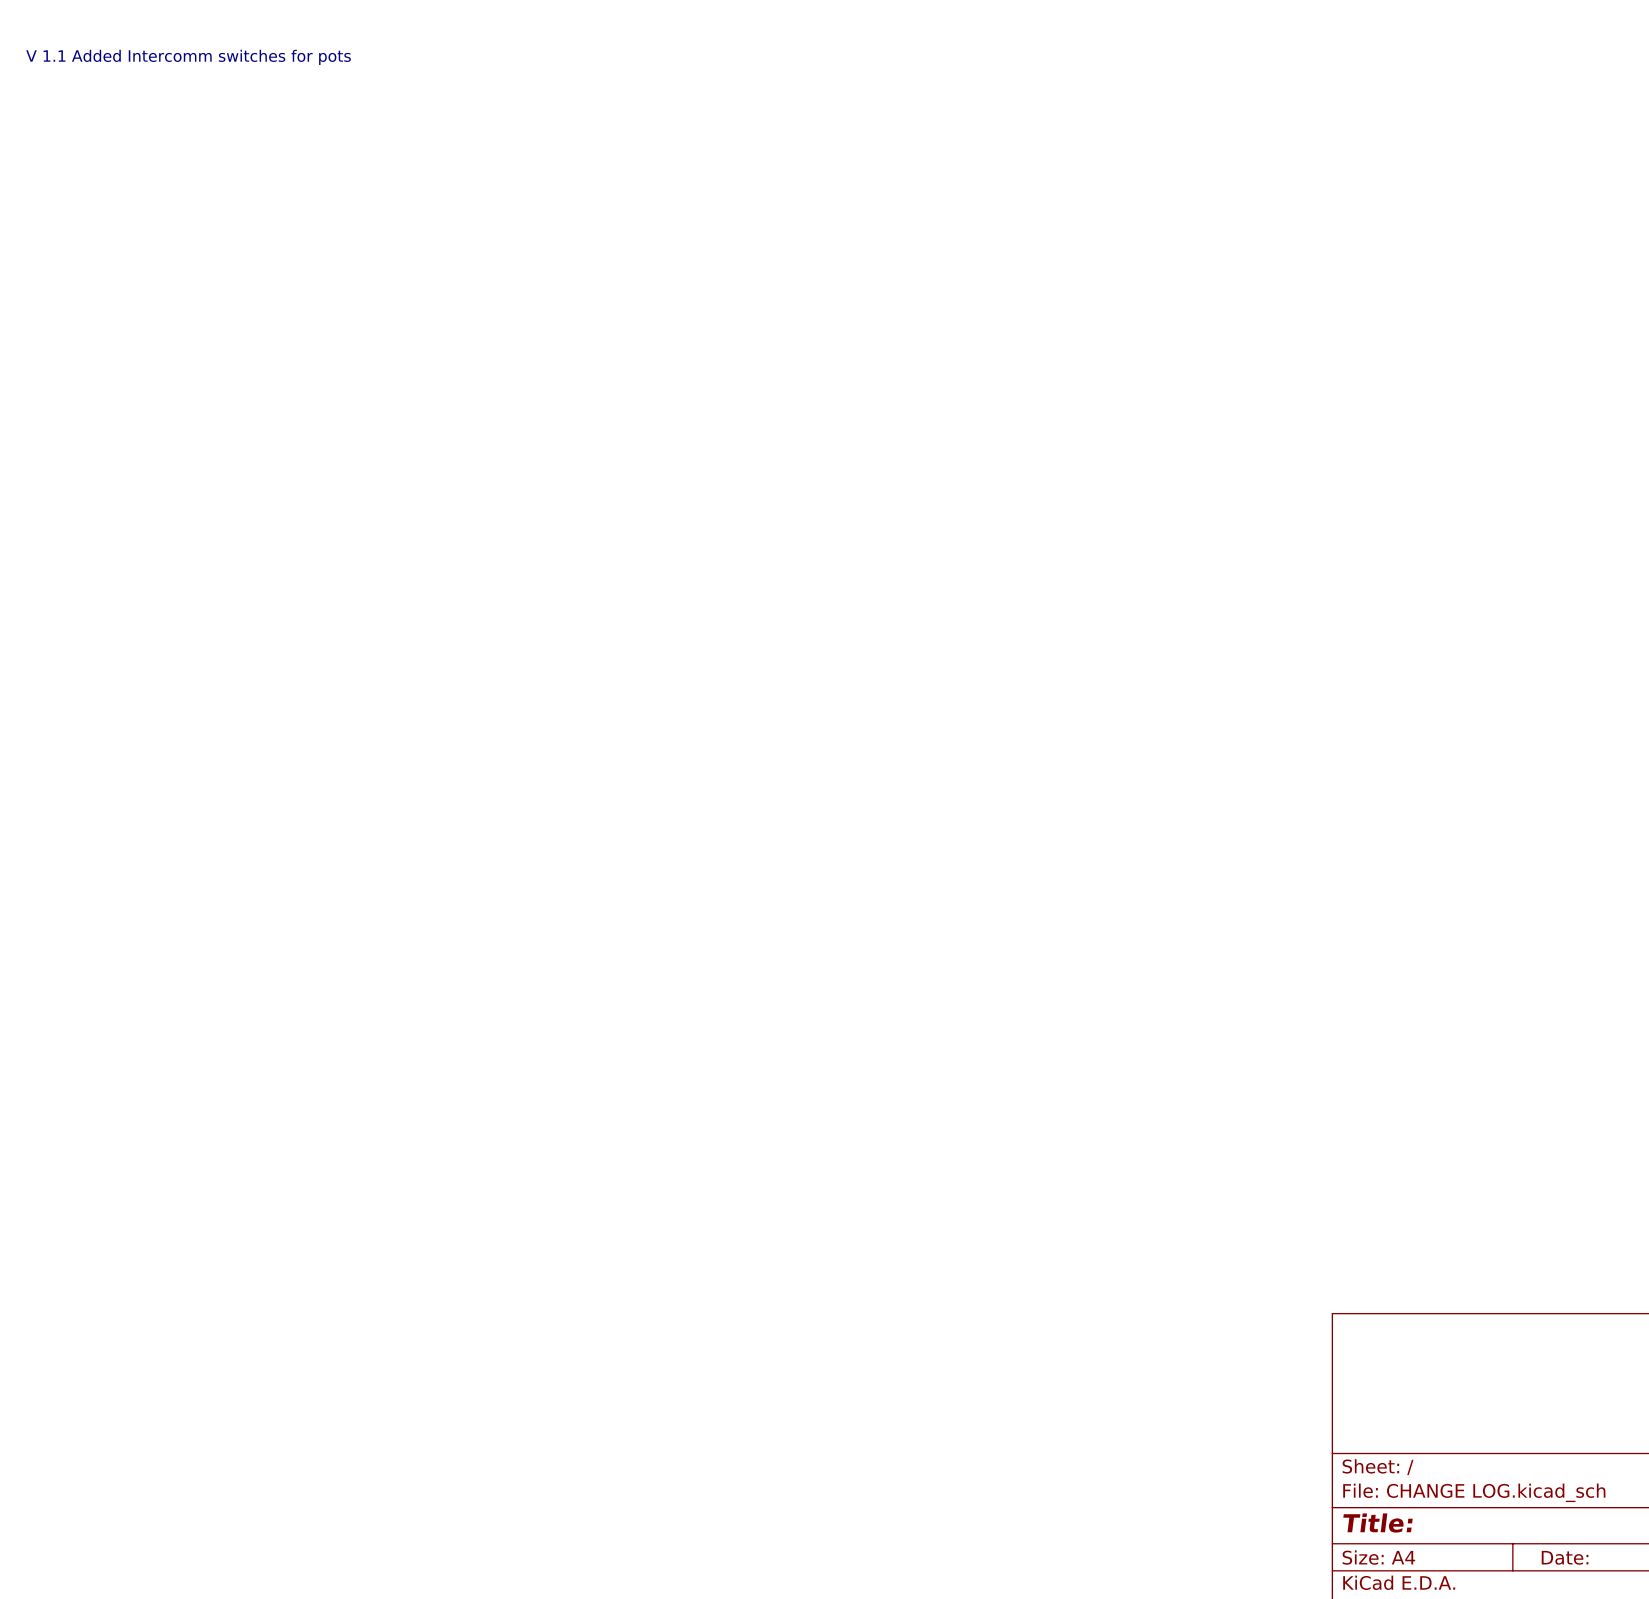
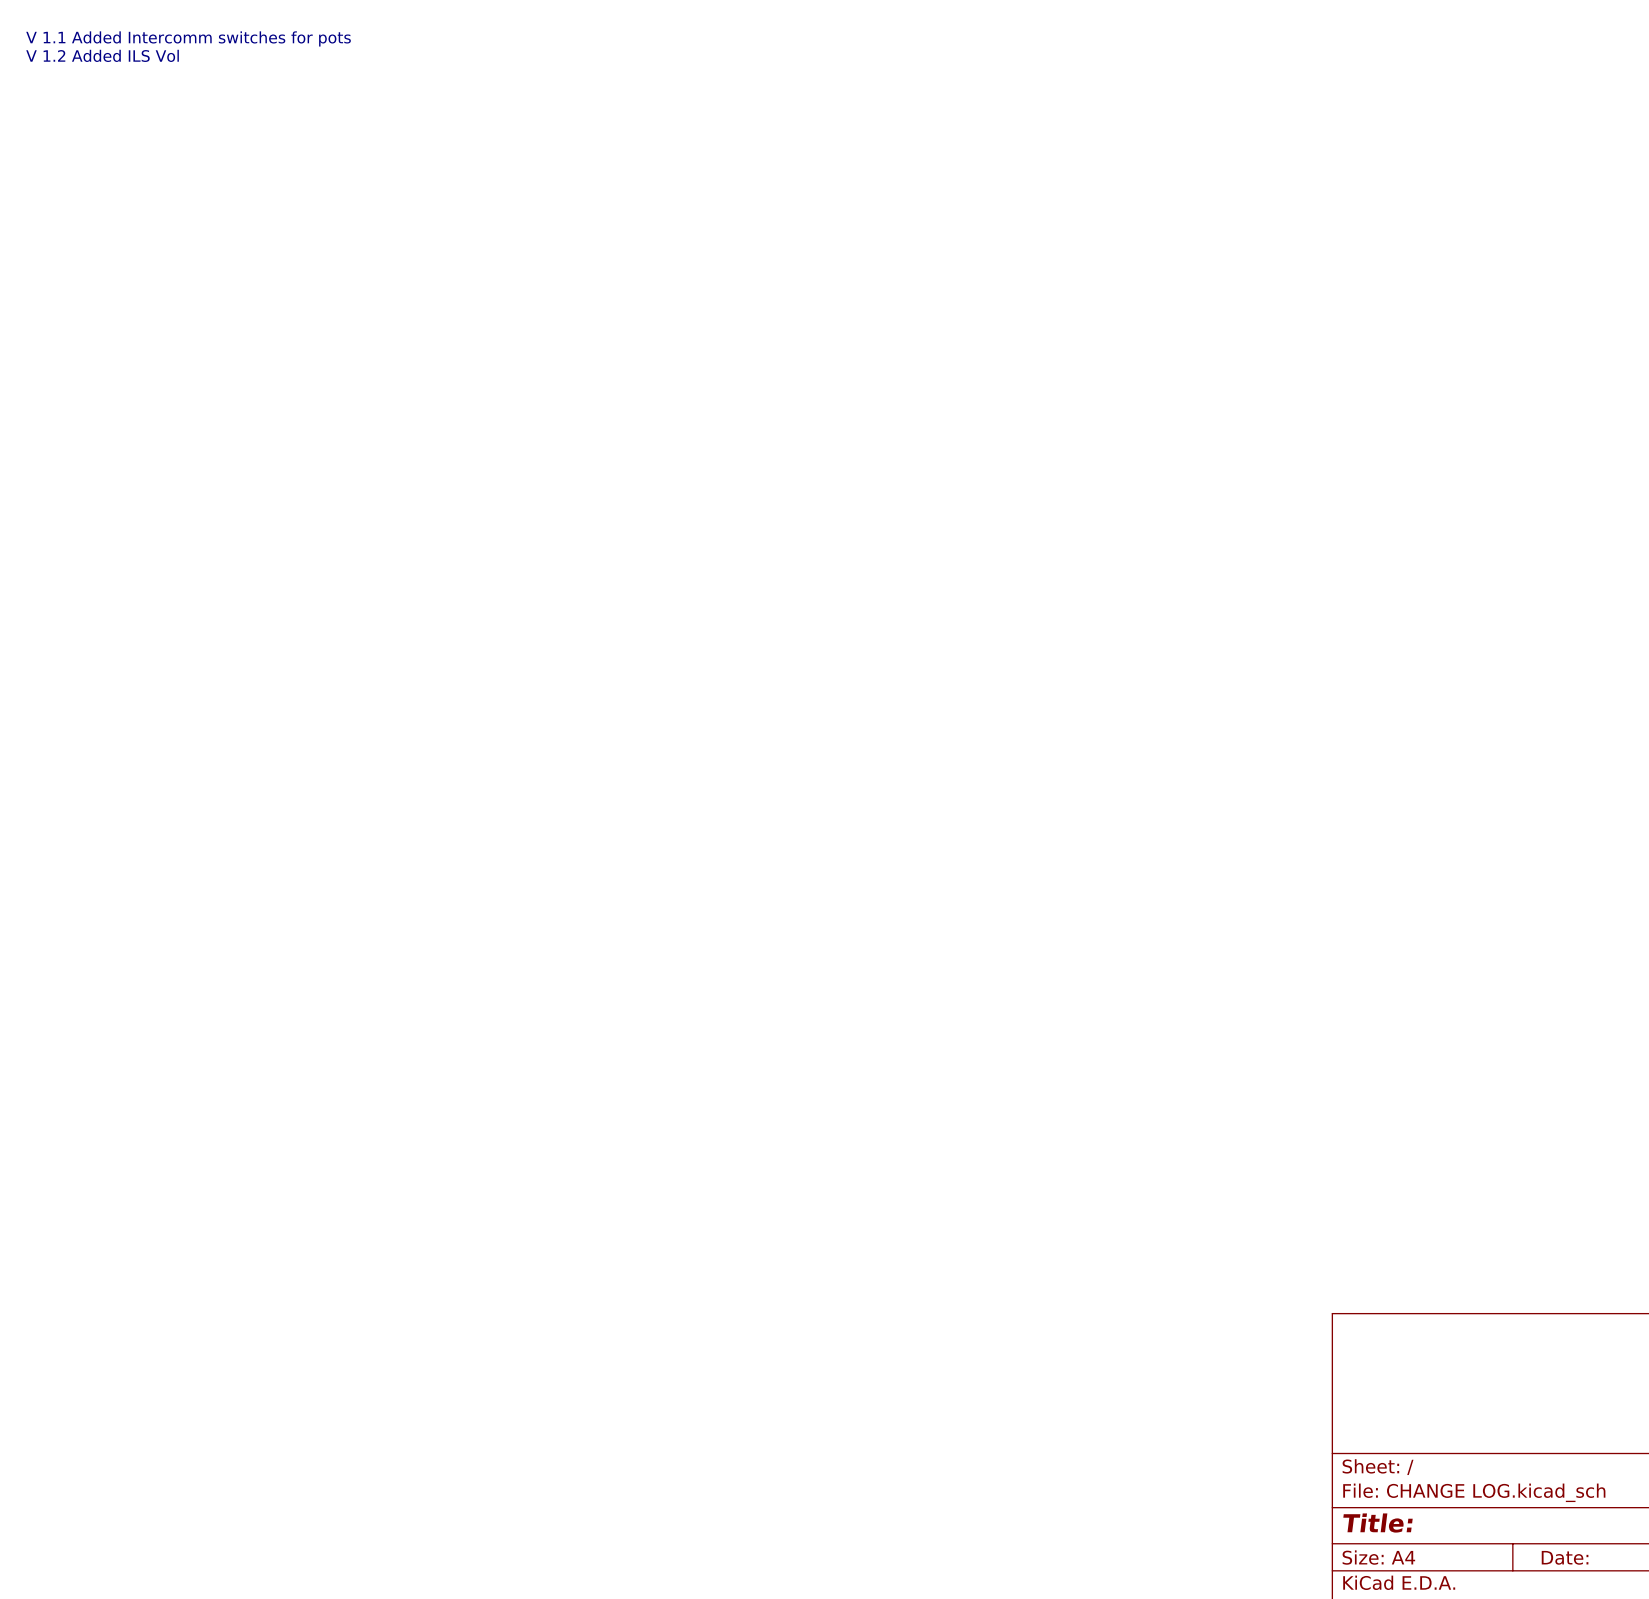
text: none -> V 1.1 Added Intercomm switches for pots (188, 38)
text: V 1.1 Added Intercomm switches for pots (188, 57) -> V 1.2 Added ILS Vol (102, 55)

